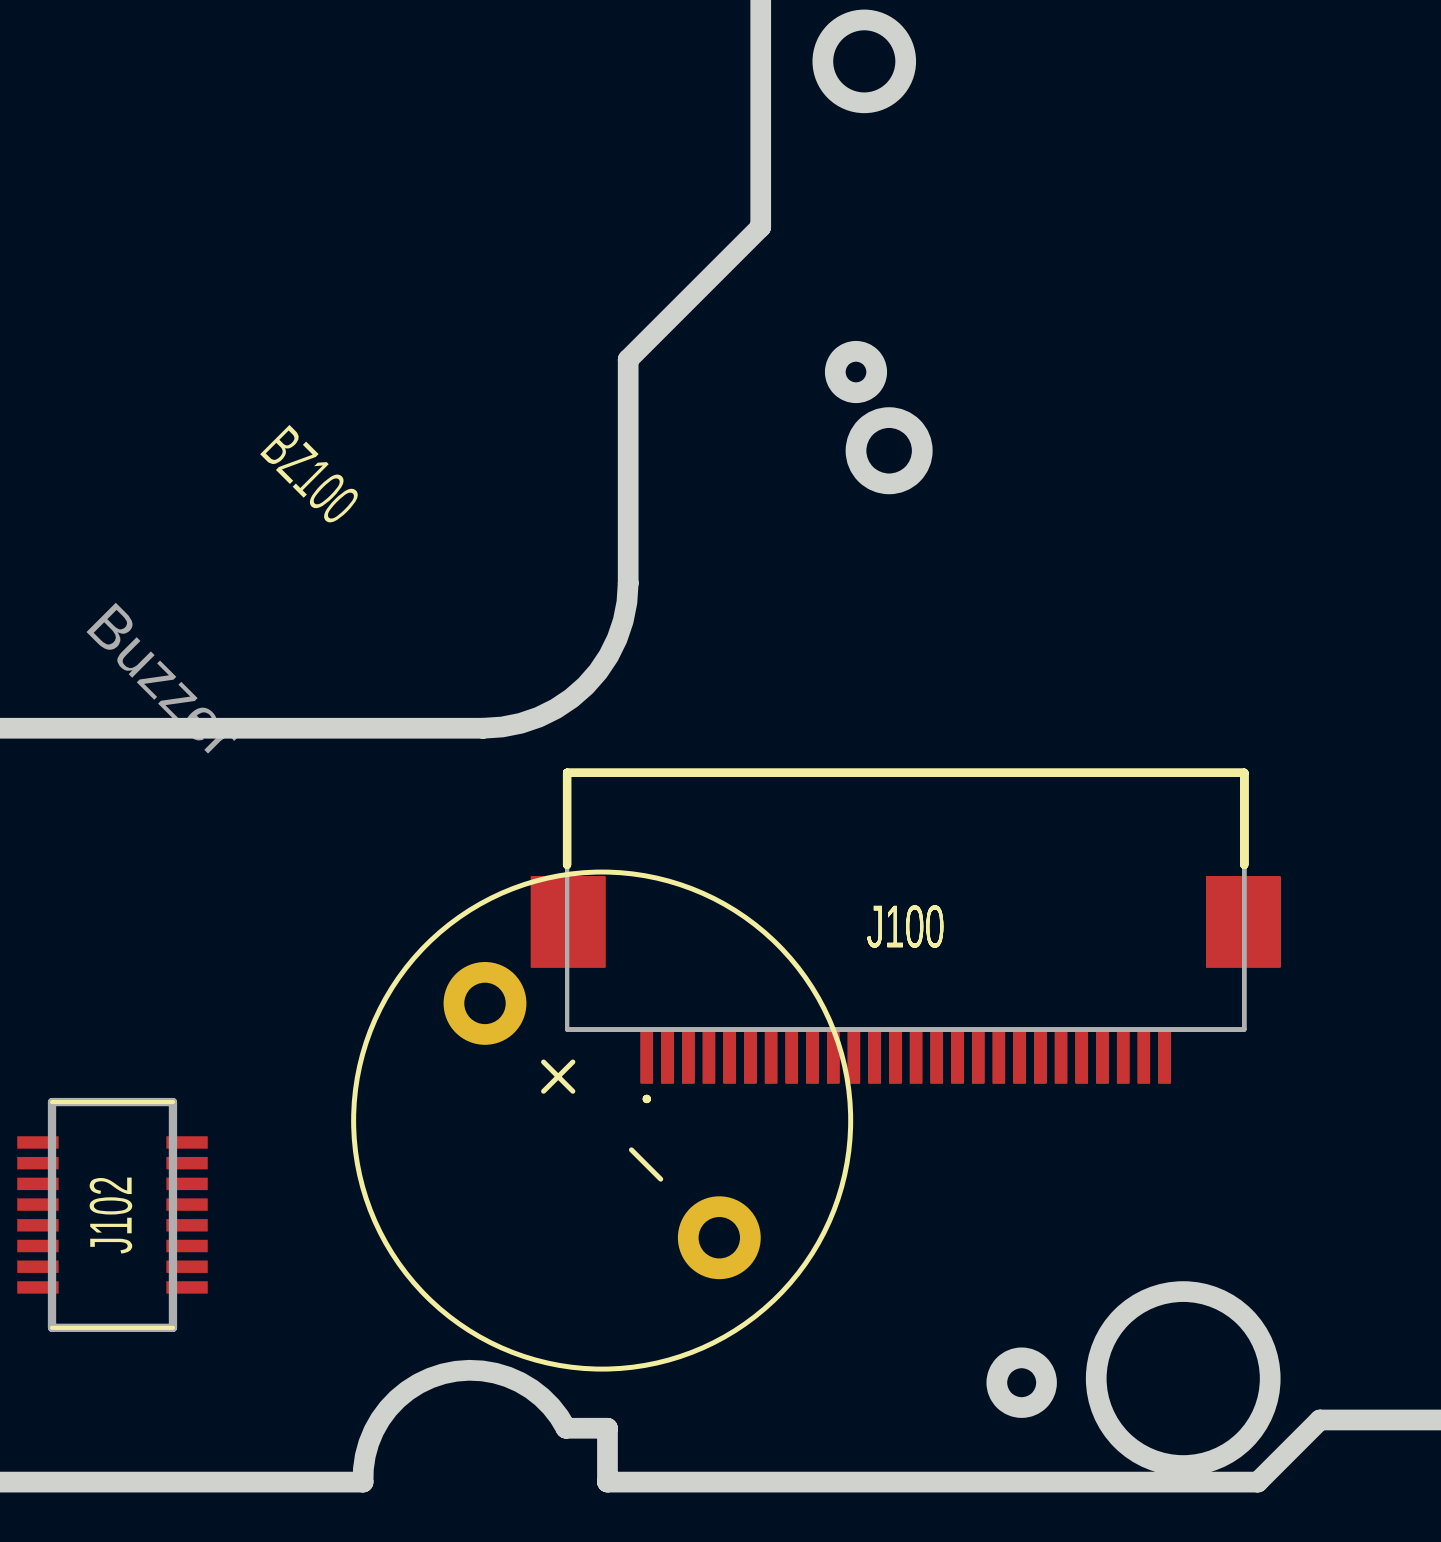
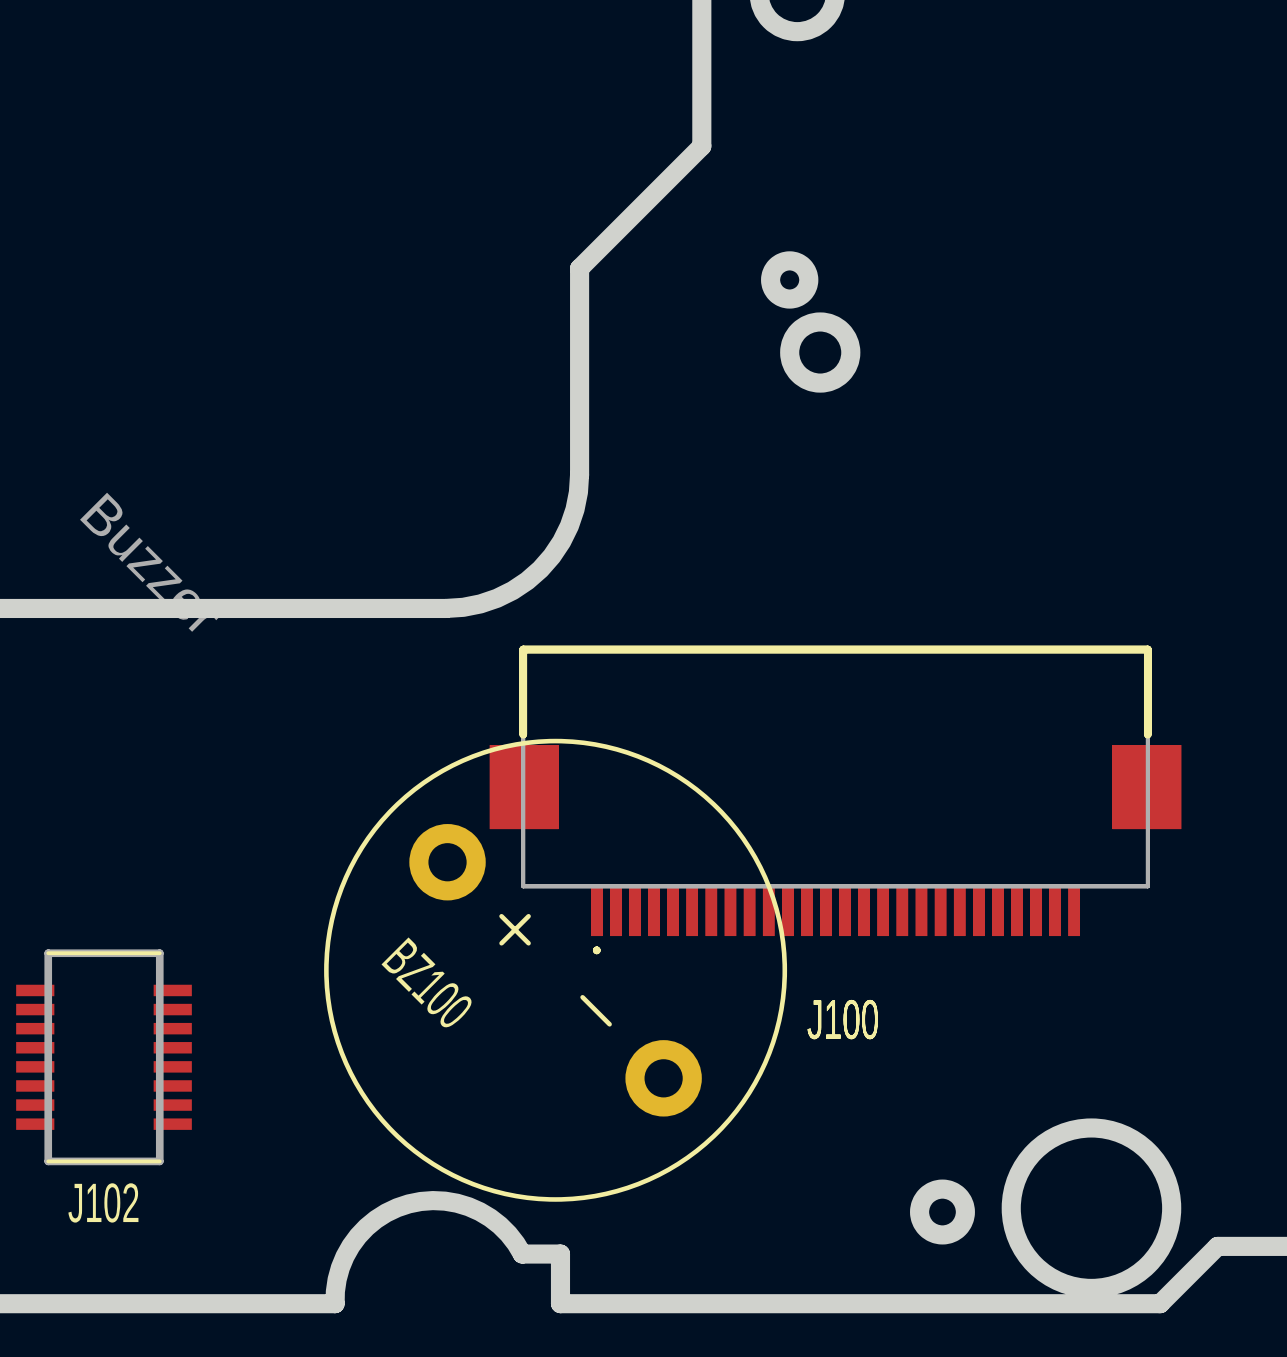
BZ100 name position: BZ100 (309, 474) -> BZ100 (427, 982)
J100: (905, 935) -> none
J100: (905, 935) -> none
J100: none -> (835, 799)
J100: none -> (835, 799)
J102 name rotation: 0° (110, 1215) -> 90° clockwise (103, 1202)
J102 name position: J102 (110, 1215) -> J102 (103, 1202)

